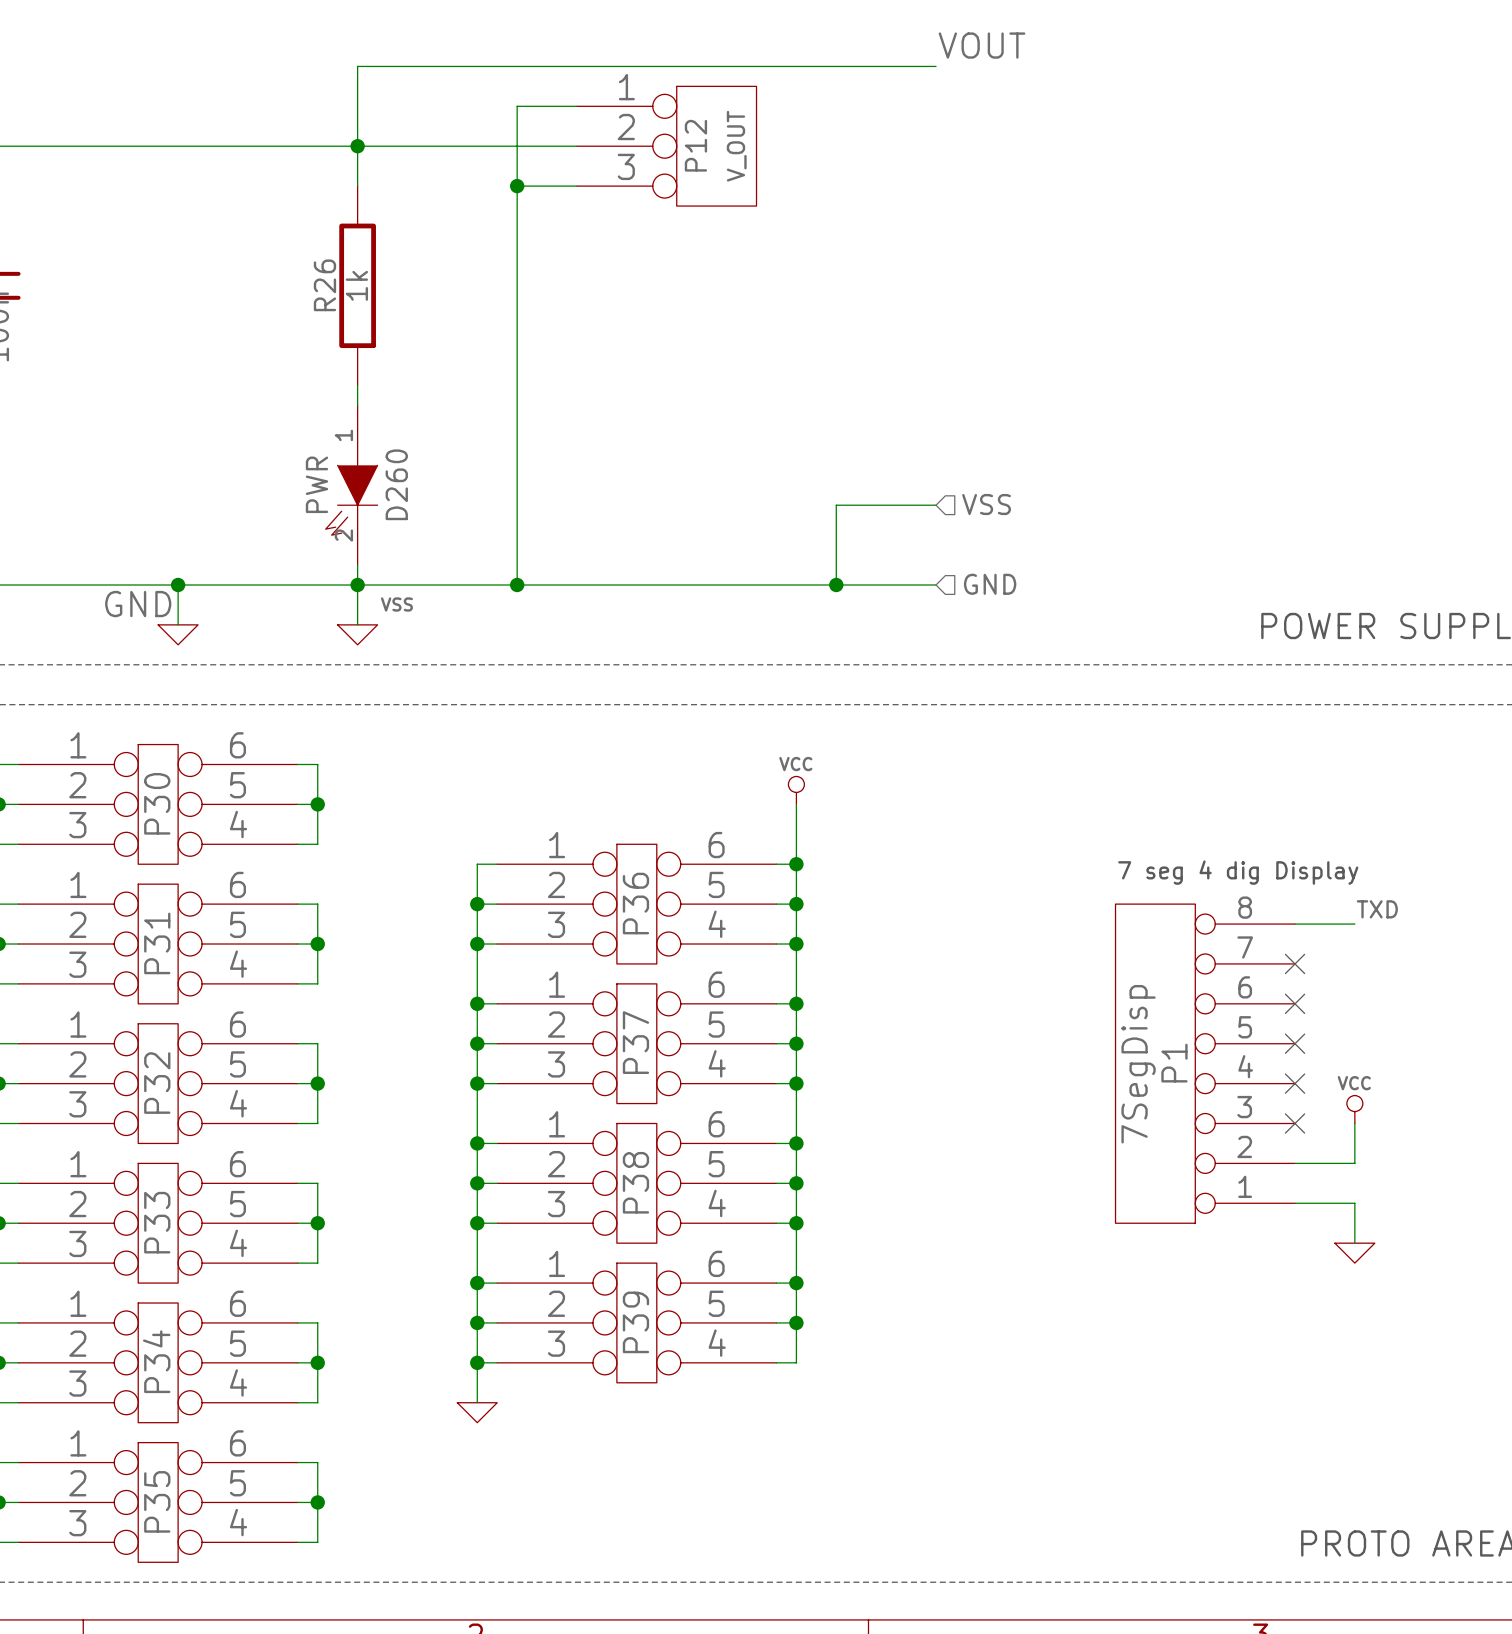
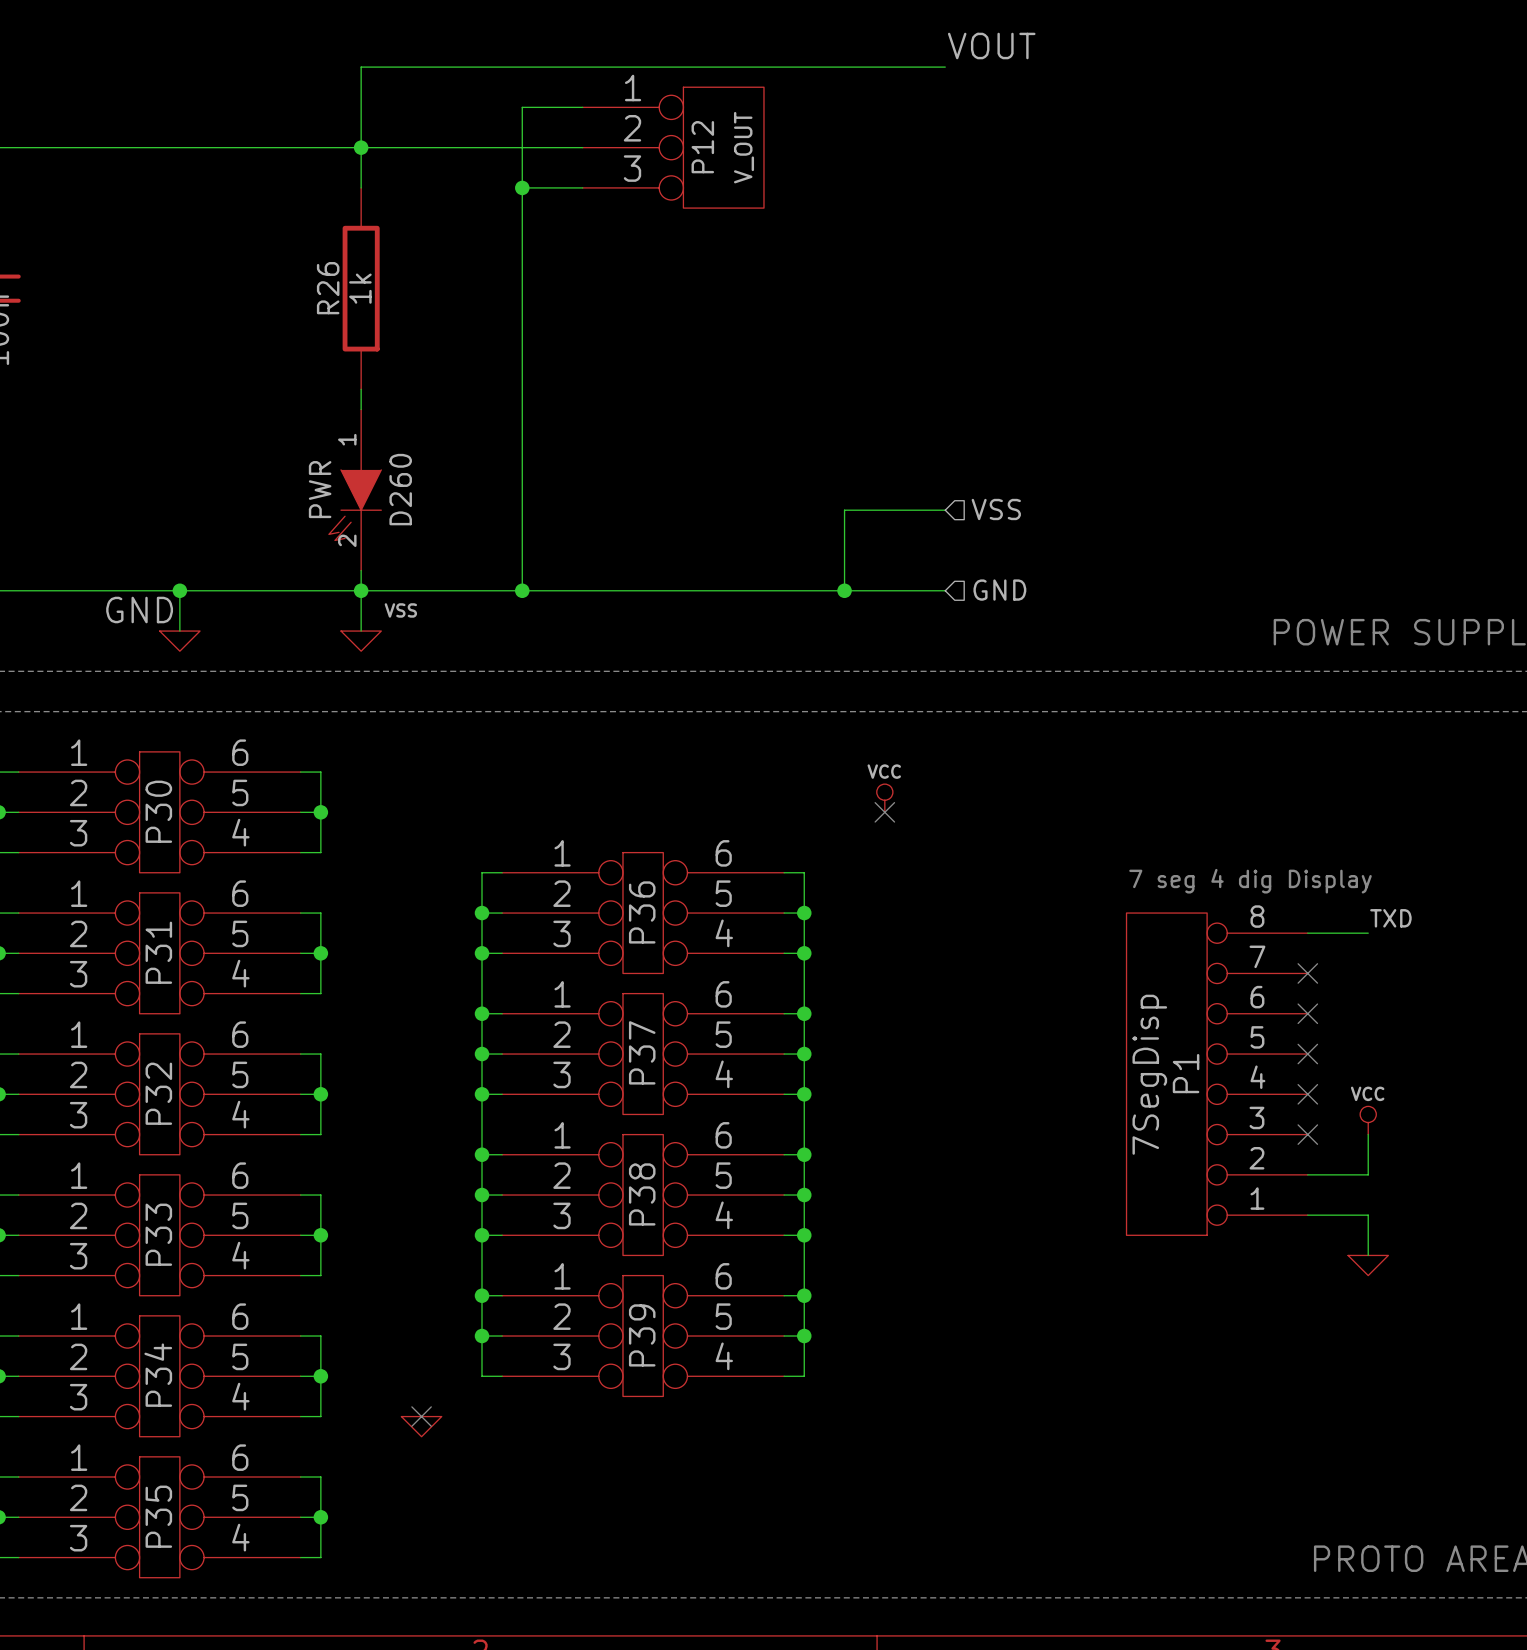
power symbol position: VCC (796, 790) -> VCC (884, 798)
wire: (796, 804) (796, 864) -> none
no-connect mark: none -> (884, 812)
junction: (796, 864) -> none
wire: (477, 1362) (477, 1402) -> none
junction: (477, 1362) -> none
no-connect mark: none -> (421, 1416)
power symbol position: (477, 1412) -> (421, 1426)

